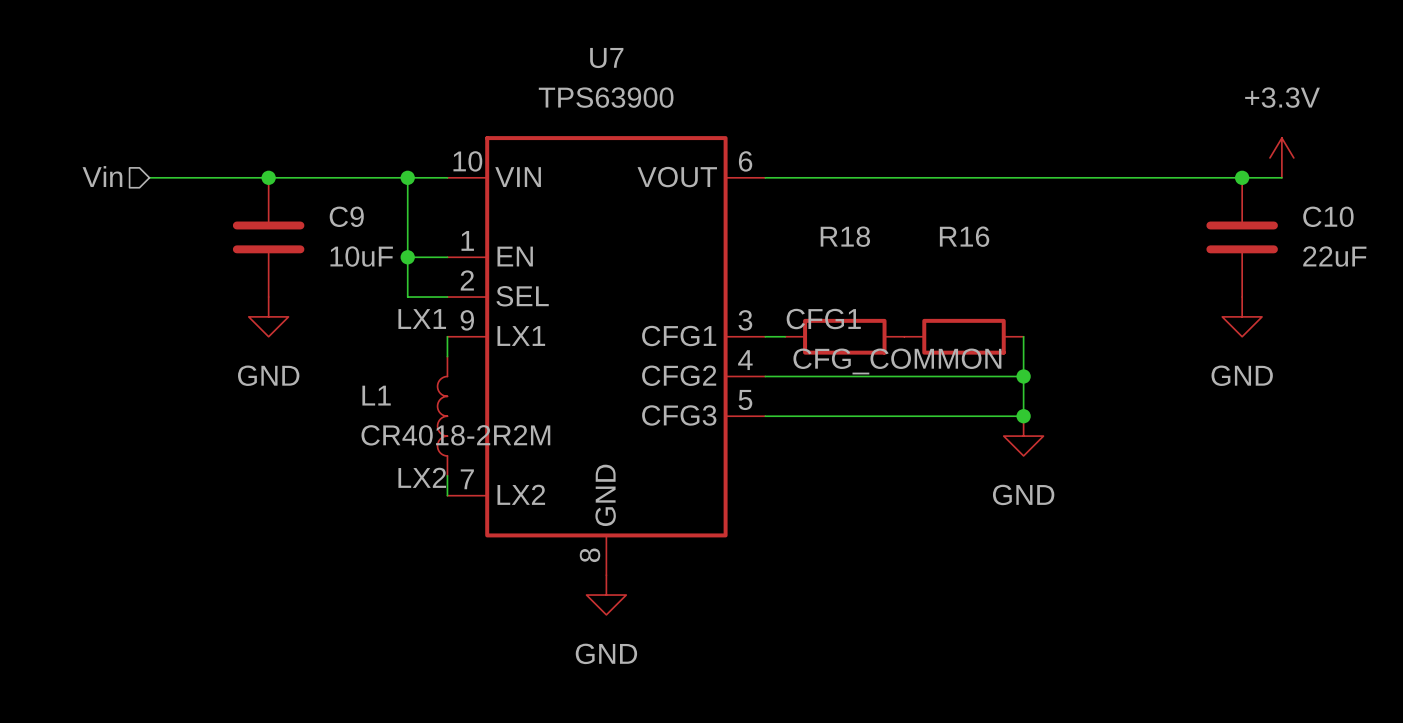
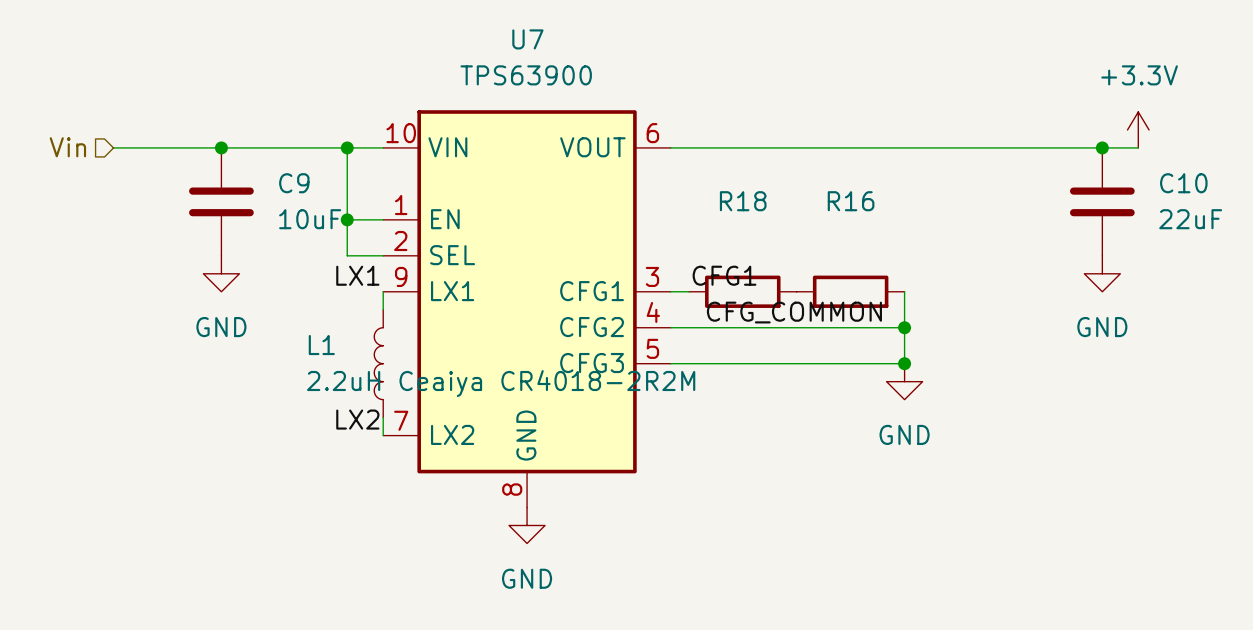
L1 value: CR4018-2R2M (455, 435) -> 2.2uH Ceaiya CR4018-2R2M (501, 383)

